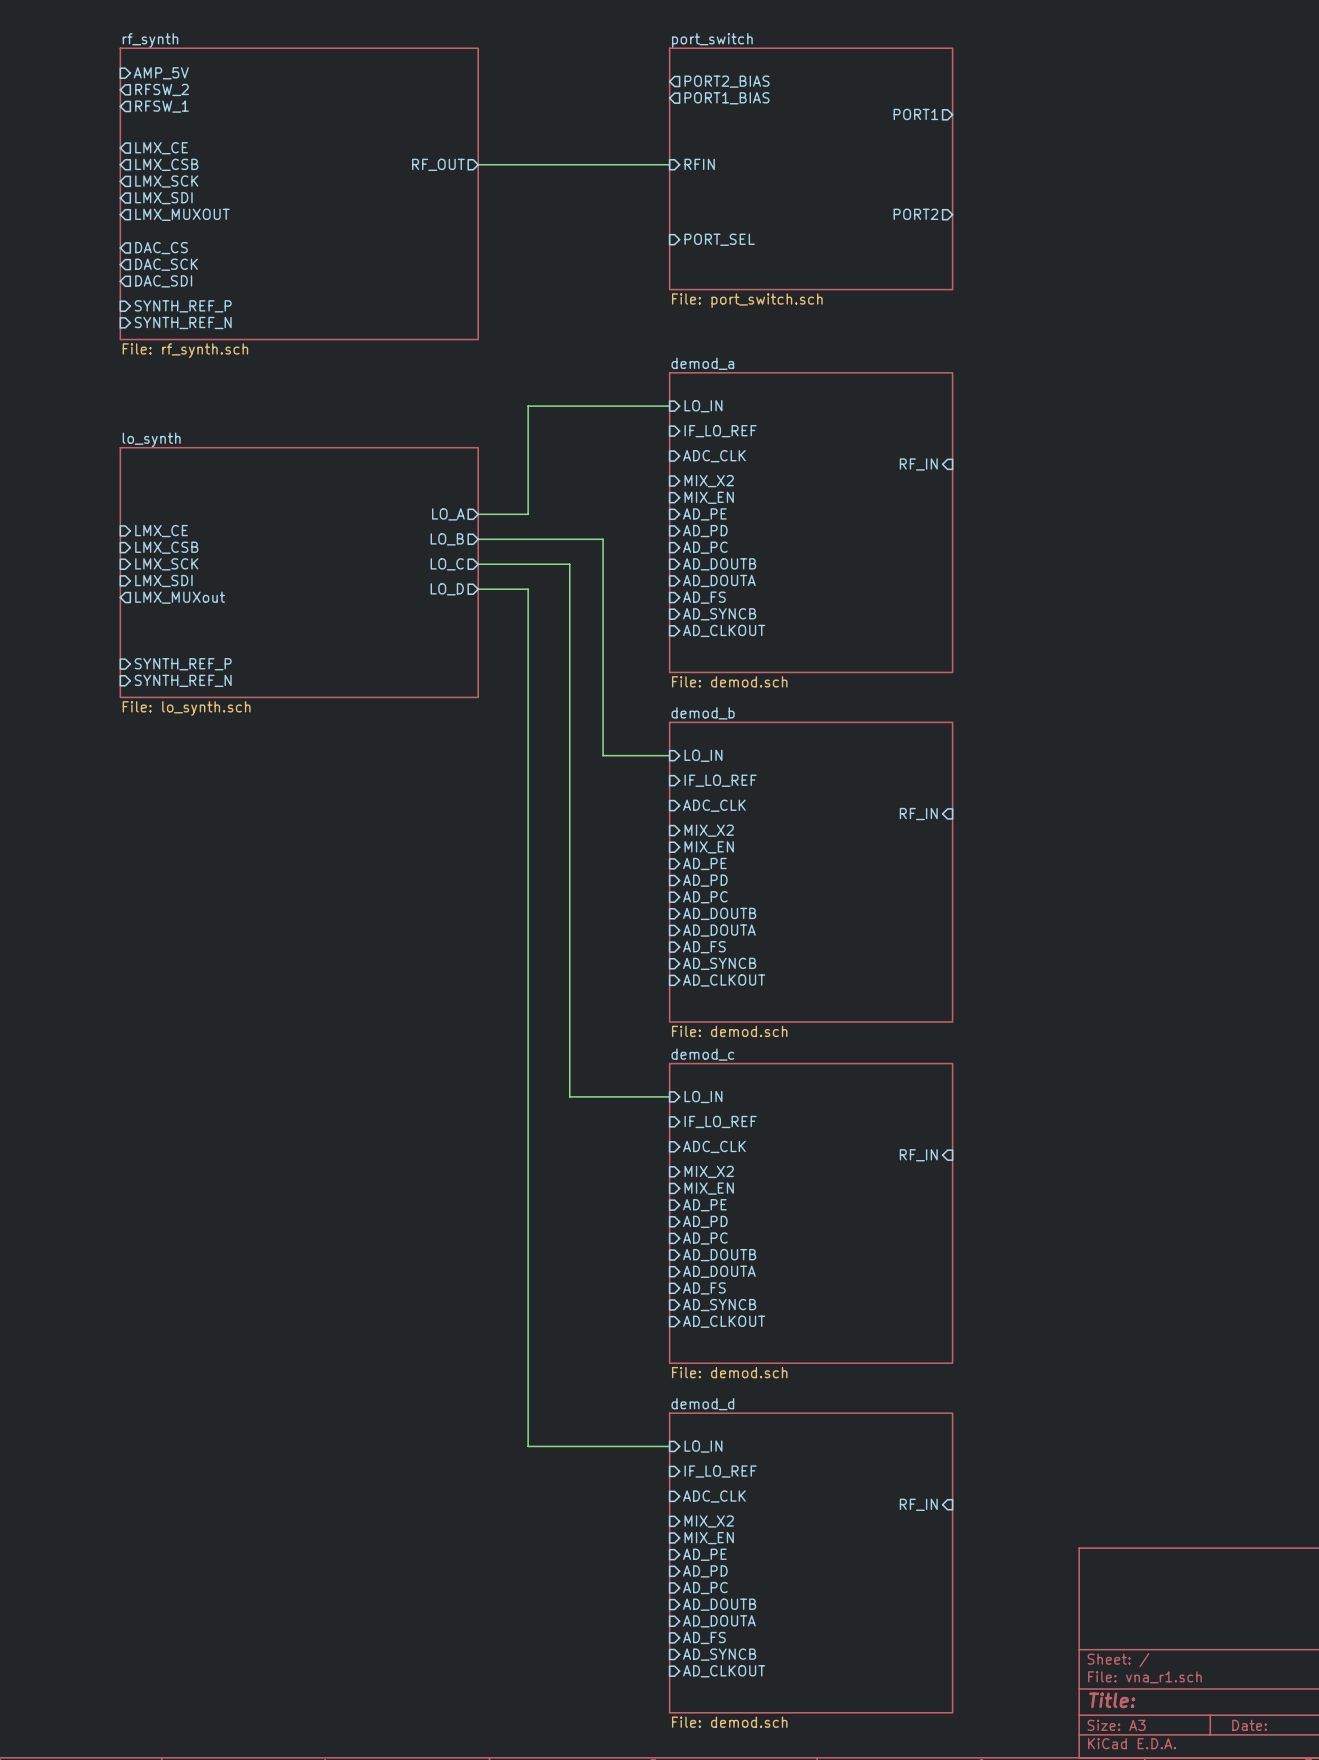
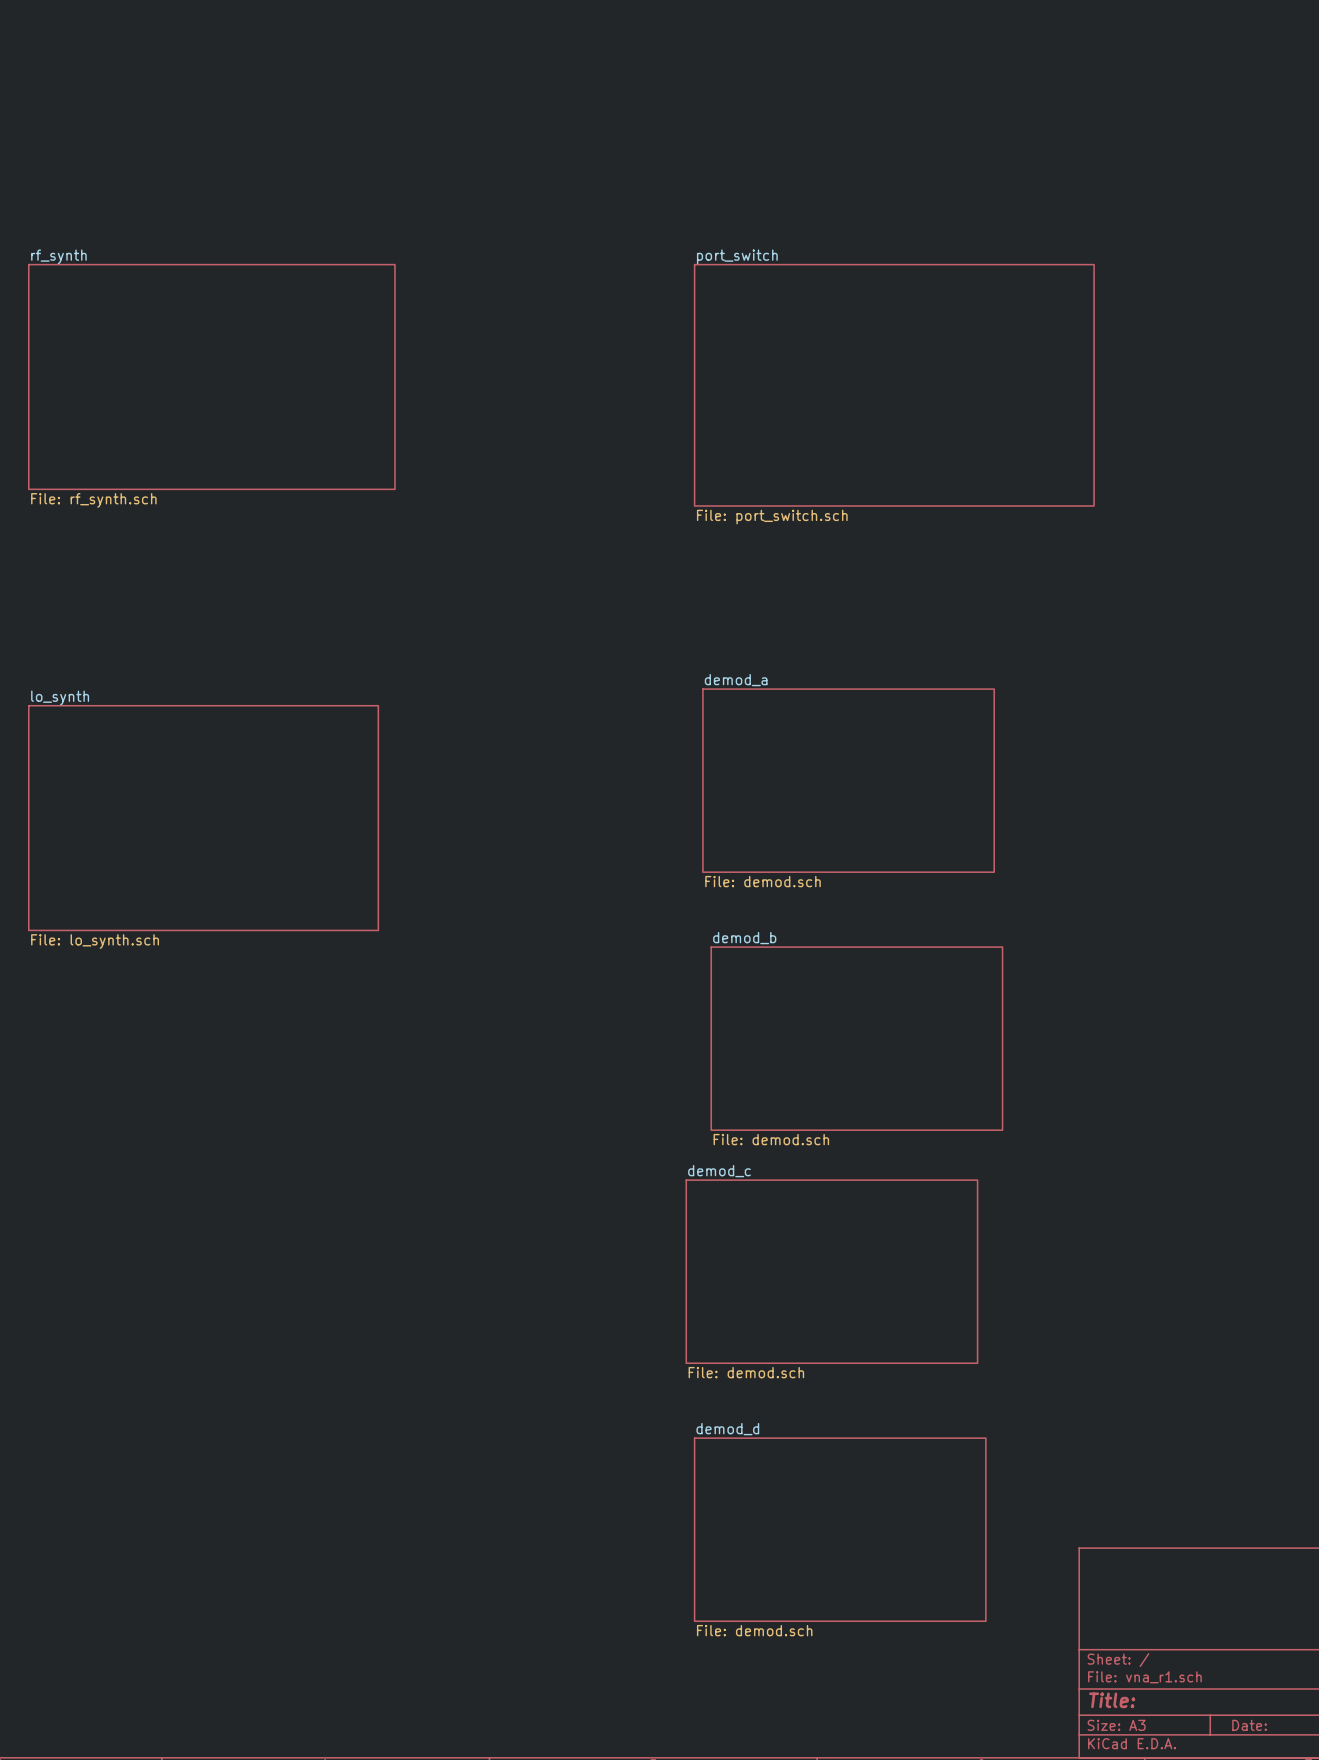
sheet pin: AMP_5V (161, 73) -> none
sheet pin: PORT2_BIAS (727, 81) -> none
sheet pin: RFSW_2 (162, 89) -> none
sheet pin: PORT1_BIAS (727, 98) -> none
sheet pin: RFSW_1 (162, 106) -> none
sheet pin: PORT1 (915, 114) -> none
sheet pin: LMX_CE (161, 148) -> none
sheet pin: LMX_CSB (166, 164) -> none
sheet pin: RF_OUT (438, 164) -> none
wire: (478, 164) (669, 164) -> none
sheet pin: RFIN (699, 164) -> none
sheet port_switch: File: port_switch.sch (811, 168) -> none
sheet pin: LMX_SCK (166, 181) -> none
sheet rf_synth: File: rf_synth.sch (299, 193) -> none
sheet pin: LMX_SDI (163, 198) -> none
sheet pin: LMX_MUXOUT (182, 214) -> none
sheet pin: PORT2 (915, 214) -> none
sheet pin: PORT_SEL (719, 239) -> none
sheet pin: DAC_CS (161, 248) -> none
sheet pin: DAC_SCK (166, 264) -> none
sheet pin: DAC_SDI (163, 281) -> none
sheet pin: SYNTH_REF_P (183, 306) -> none
sheet pin: SYNTH_REF_N (183, 322) -> none
sheet rf_synth: none -> File: rf_synth.sch (211, 376)
sheet port_switch: none -> File: port_switch.sch (894, 385)
wire: (669, 406) (528, 406) (528, 514) (478, 514) -> none
sheet pin: LO_IN (703, 406) -> none
sheet pin: IF_LO_REF (720, 431) -> none
sheet pin: ADC_CLK (714, 456) -> none
sheet pin: RF_IN (918, 464) -> none
sheet pin: MIX_X2 (709, 481) -> none
sheet pin: MIX_EN (709, 497) -> none
sheet pin: LO_A (448, 514) -> none
sheet pin: AD_PE (704, 514) -> none
sheet demod_a: File: demod.sch (811, 522) -> none
sheet pin: LMX_CE (161, 531) -> none
sheet pin: AD_PD (705, 531) -> none
sheet pin: LO_B (447, 539) -> none
wire: (478, 539) (603, 539) (603, 755) (669, 755) -> none
sheet pin: LMX_CSB (166, 547) -> none
sheet pin: AD_PC (705, 547) -> none
sheet pin: LMX_SCK (166, 564) -> none
sheet pin: LO_C (447, 564) -> none
wire: (478, 564) (569, 564) (569, 1096) (669, 1096) -> none
sheet pin: AD_DOUTB (719, 564) -> none
sheet lo_synth: File: lo_synth.sch (299, 572) -> none
sheet pin: LMX_SDI (163, 580) -> none
sheet pin: AD_DOUTA (719, 580) -> none
sheet pin: LO_D (447, 589) -> none
wire: (478, 589) (528, 589) (528, 1446) (669, 1446) -> none
sheet pin: LMX_MUXout (180, 597) -> none
sheet pin: AD_FS (704, 597) -> none
sheet pin: AD_SYNCB (719, 614) -> none
sheet pin: AD_CLKOUT (724, 630) -> none
sheet pin: SYNTH_REF_P (183, 664) -> none
sheet pin: SYNTH_REF_N (183, 680) -> none
sheet pin: LO_IN (703, 755) -> none
sheet pin: IF_LO_REF (720, 780) -> none
sheet demod_a: none -> File: demod.sch (848, 780)
sheet pin: ADC_CLK (714, 805) -> none
sheet pin: RF_IN (918, 814) -> none
sheet lo_synth: none -> File: lo_synth.sch (203, 818)
sheet pin: MIX_X2 (709, 830) -> none
sheet pin: MIX_EN (709, 847) -> none
sheet pin: AD_PE (704, 863) -> none
sheet demod_b: File: demod.sch (811, 872) -> none
sheet pin: AD_PD (705, 880) -> none
sheet pin: AD_PC (705, 897) -> none
sheet pin: AD_DOUTB (719, 913) -> none
sheet pin: AD_DOUTA (719, 930) -> none
sheet pin: AD_FS (704, 947) -> none
sheet pin: AD_SYNCB (719, 963) -> none
sheet pin: AD_CLKOUT (724, 980) -> none
sheet demod_b: none -> File: demod.sch (856, 1038)
sheet pin: LO_IN (703, 1097) -> none
sheet pin: IF_LO_REF (720, 1121) -> none
sheet pin: ADC_CLK (714, 1146) -> none
sheet pin: RF_IN (918, 1155) -> none
sheet pin: MIX_X2 (709, 1171) -> none
sheet pin: MIX_EN (709, 1188) -> none
sheet pin: AD_PE (704, 1205) -> none
sheet demod_c: File: demod.sch (811, 1213) -> none
sheet pin: AD_PD (705, 1221) -> none
sheet pin: AD_PC (705, 1238) -> none
sheet pin: AD_DOUTB (719, 1255) -> none
sheet pin: AD_DOUTA (719, 1271) -> none
sheet demod_c: none -> File: demod.sch (831, 1271)
sheet pin: AD_FS (704, 1288) -> none
sheet pin: AD_SYNCB (719, 1305) -> none
sheet pin: AD_CLKOUT (724, 1321) -> none
sheet pin: LO_IN (703, 1446) -> none
sheet pin: IF_LO_REF (720, 1471) -> none
sheet pin: ADC_CLK (714, 1496) -> none
sheet pin: RF_IN (918, 1504) -> none
sheet pin: MIX_X2 (709, 1521) -> none
sheet demod_d: none -> File: demod.sch (840, 1529)
sheet pin: MIX_EN (709, 1538) -> none
sheet pin: AD_PE (704, 1554) -> none
sheet demod_d: File: demod.sch (811, 1562) -> none
sheet pin: AD_PD (705, 1571) -> none
sheet pin: AD_PC (705, 1588) -> none
sheet pin: AD_DOUTB (719, 1604) -> none
sheet pin: AD_DOUTA (719, 1621) -> none
sheet pin: AD_FS (704, 1637) -> none
sheet pin: AD_SYNCB (719, 1654) -> none
sheet pin: AD_CLKOUT (724, 1671) -> none

